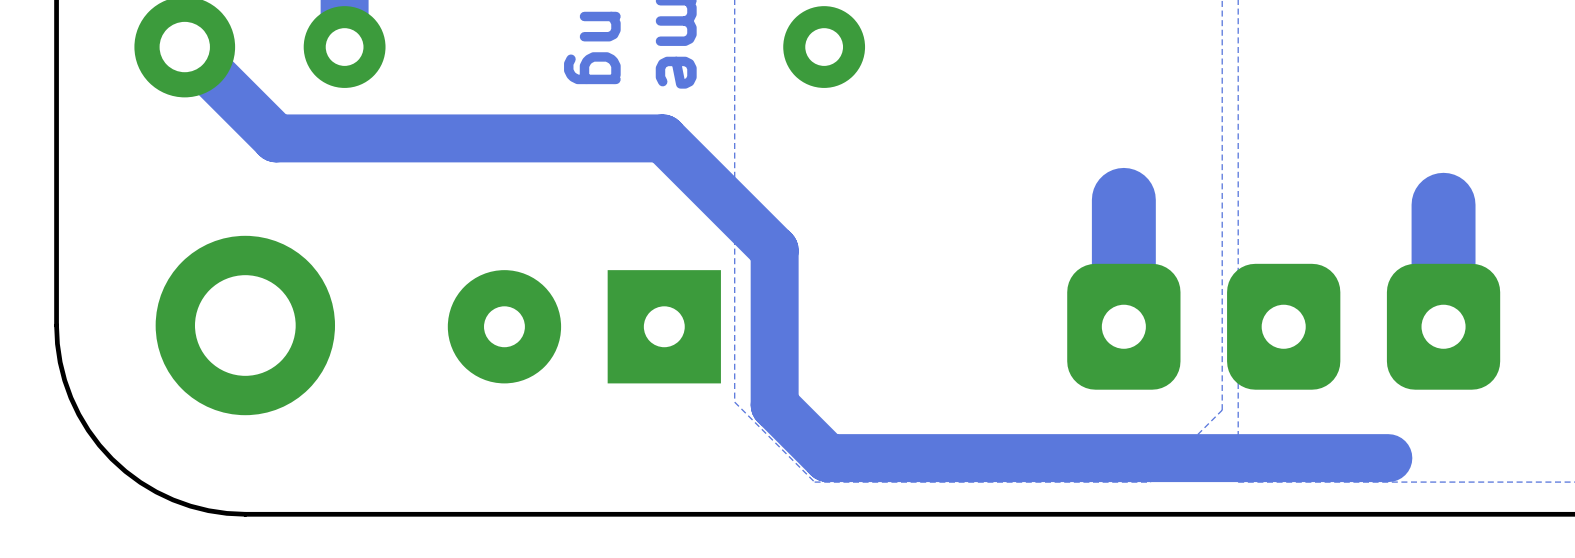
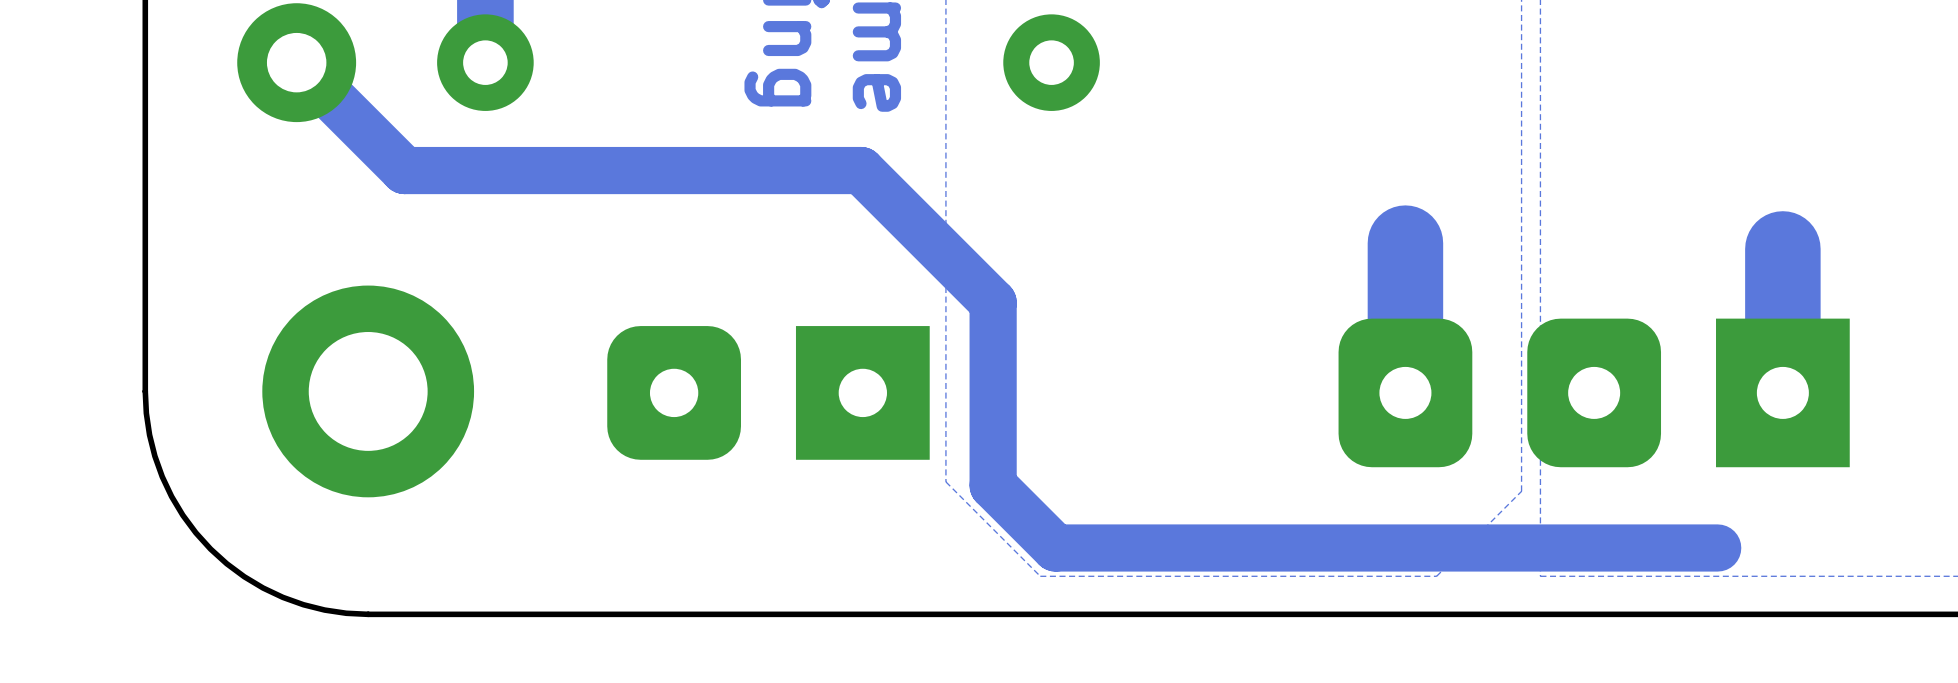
track width: thick (184, 47) (276, 138) (662, 138) (774, 250) (774, 405) (827, 458) (1388, 458) -> thin (296, 62) (404, 170) (861, 170) (993, 302) (993, 485) (1055, 547) (1717, 547)
part footprint: [1067, 263, 1501, 390] -> [1338, 318, 1850, 468]
part footprint: [447, 270, 721, 384] -> [607, 326, 930, 460]

